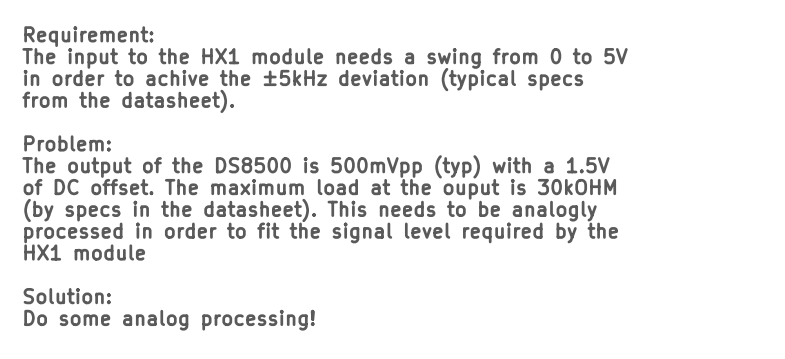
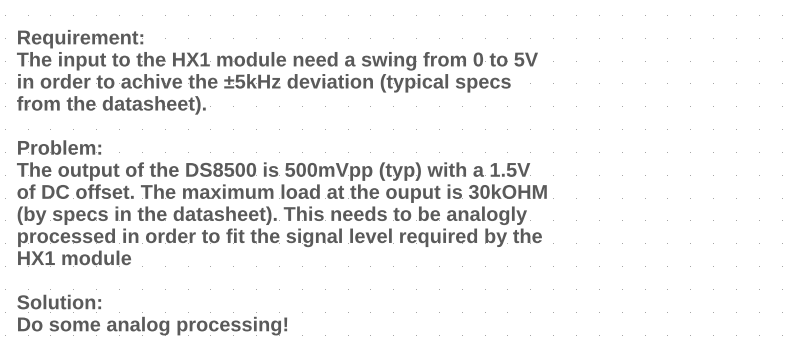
text: The input to the HX1 module needs a swing from 0 to 5V (325, 58) -> The input to the HX1 module need a swing from 0 to 5V (277, 61)

